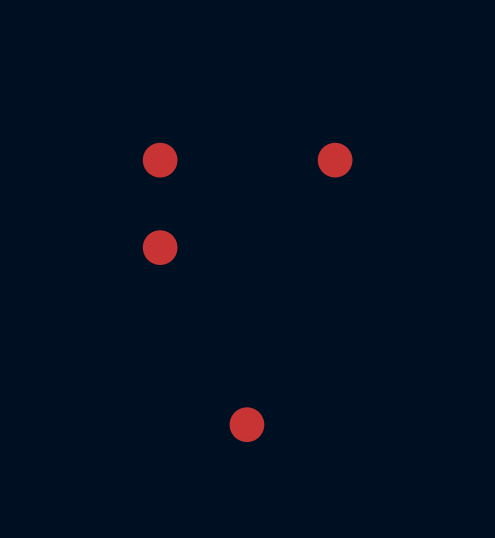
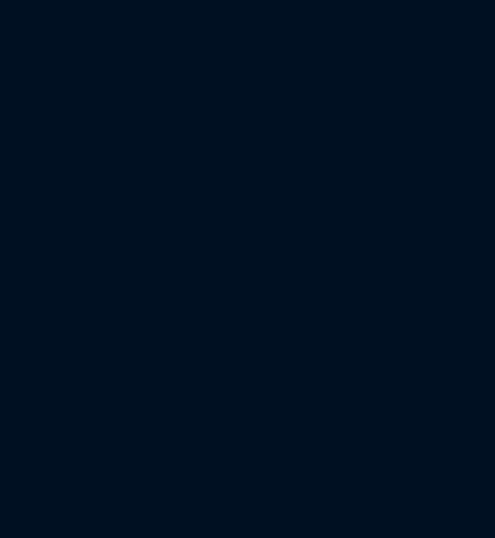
part: (160, 160) -> none
part: (335, 160) -> none
part: (160, 247) -> none
part: (246, 424) -> none

